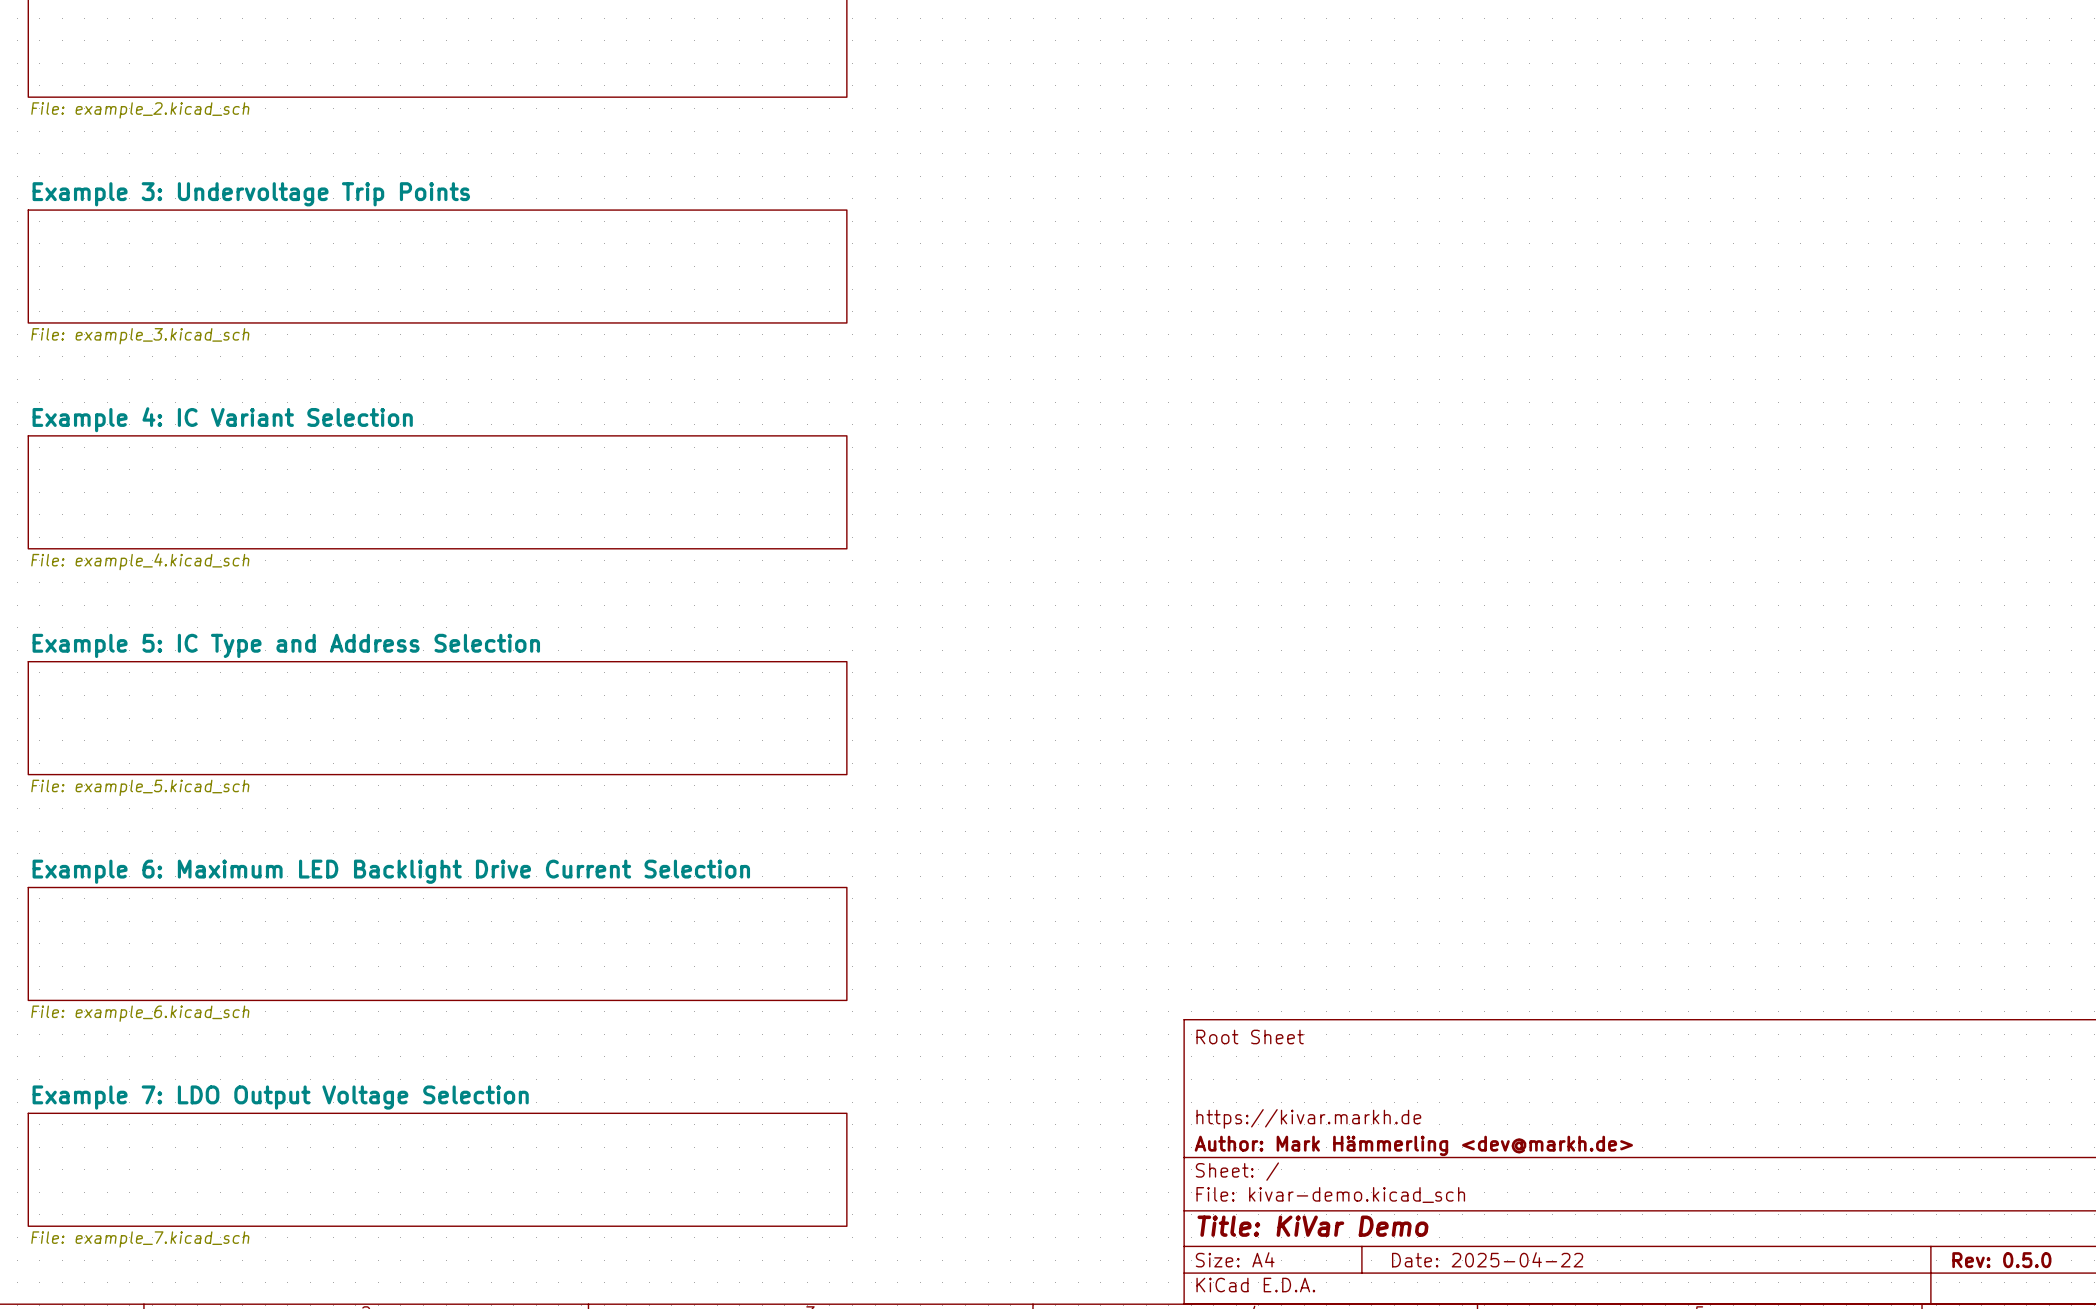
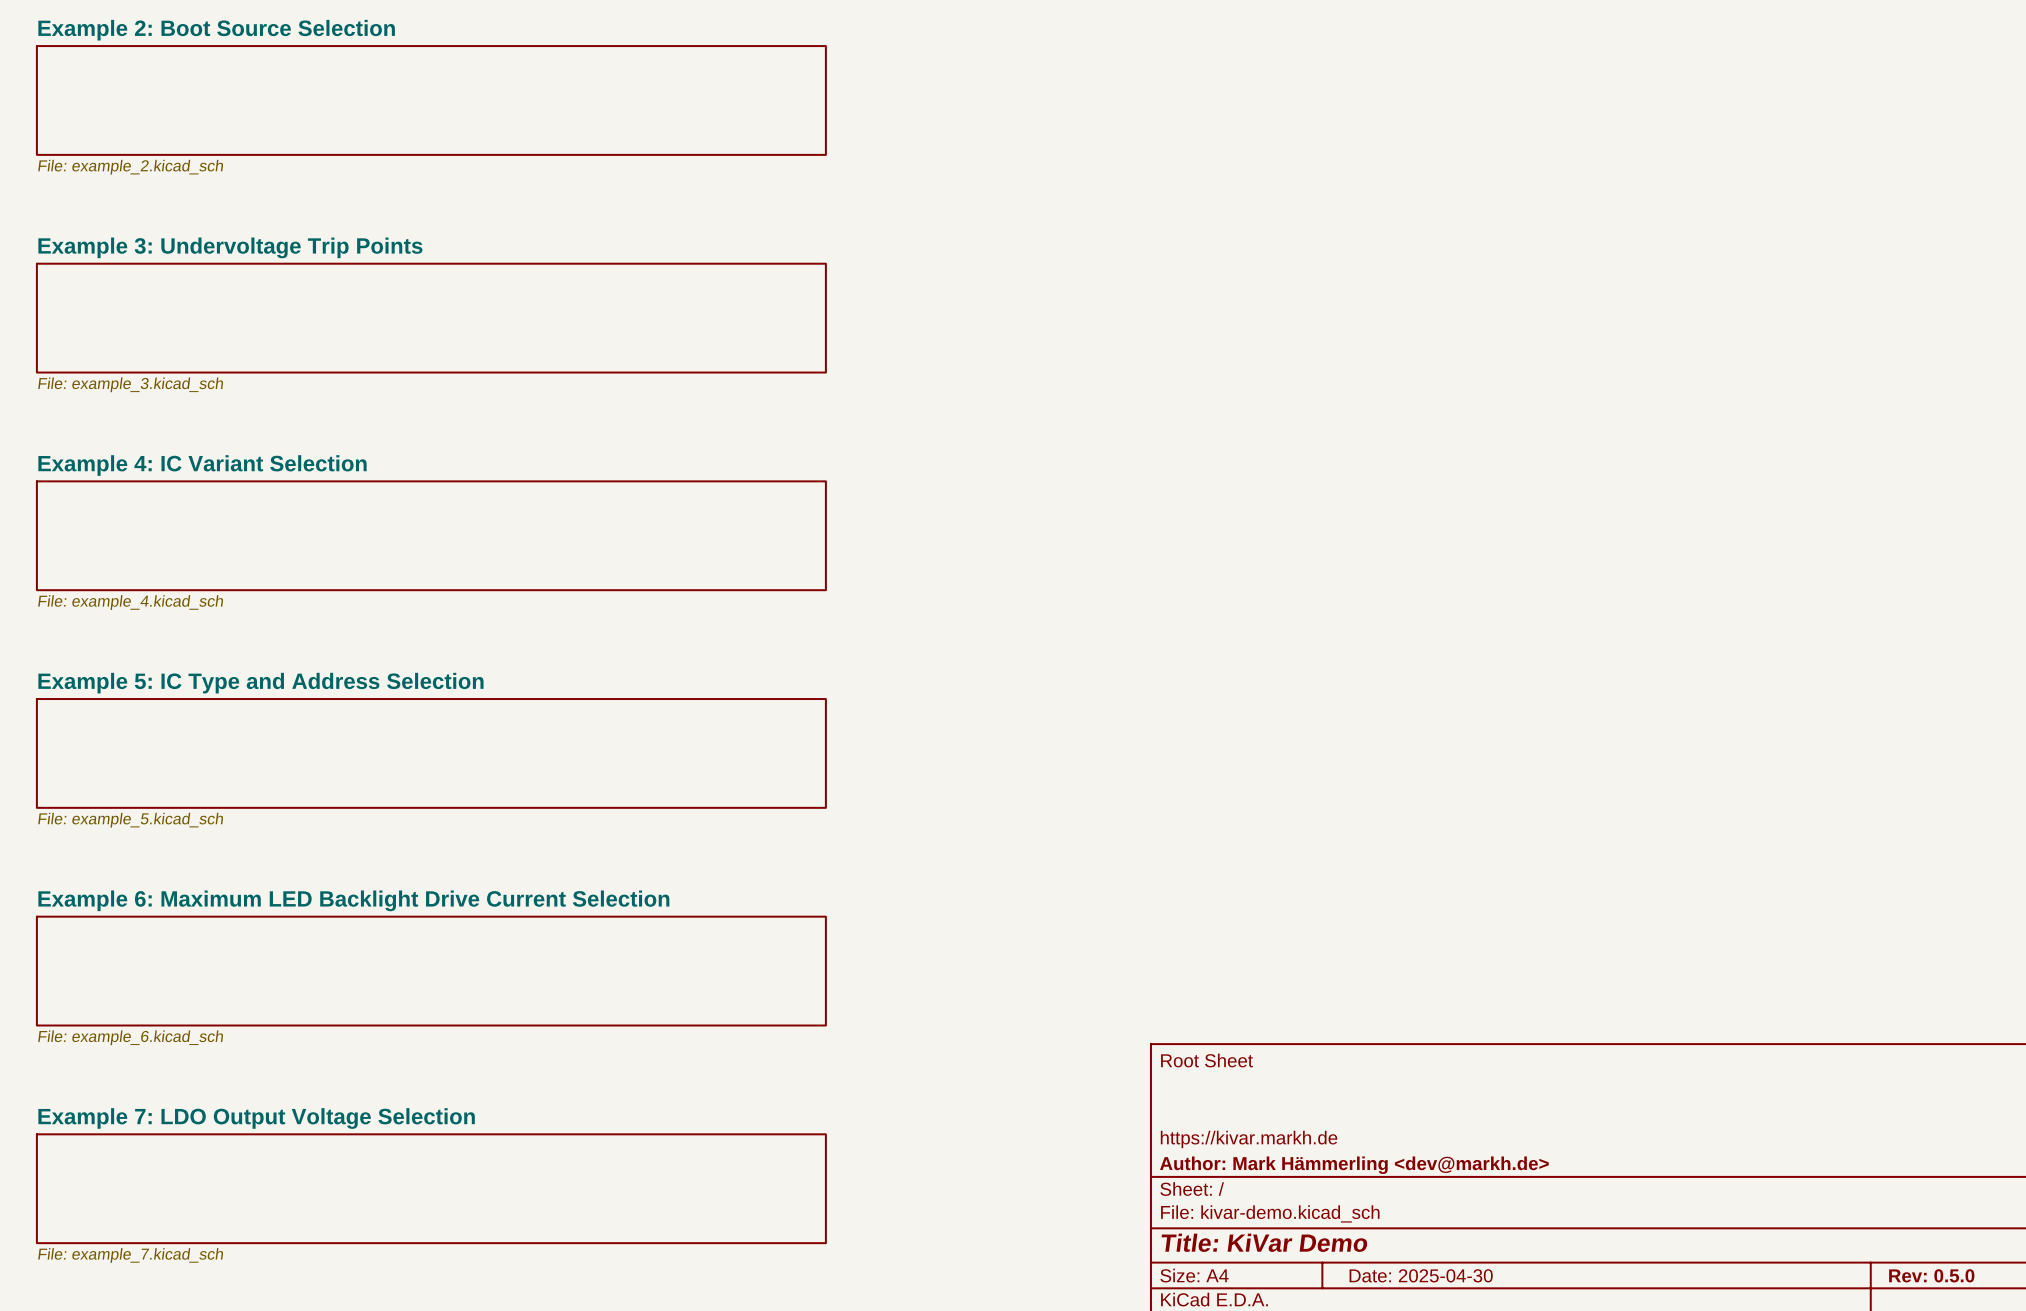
title block: Date: 2025-04-22 (1487, 1259) -> Date: 2025-04-30 (1421, 1275)

